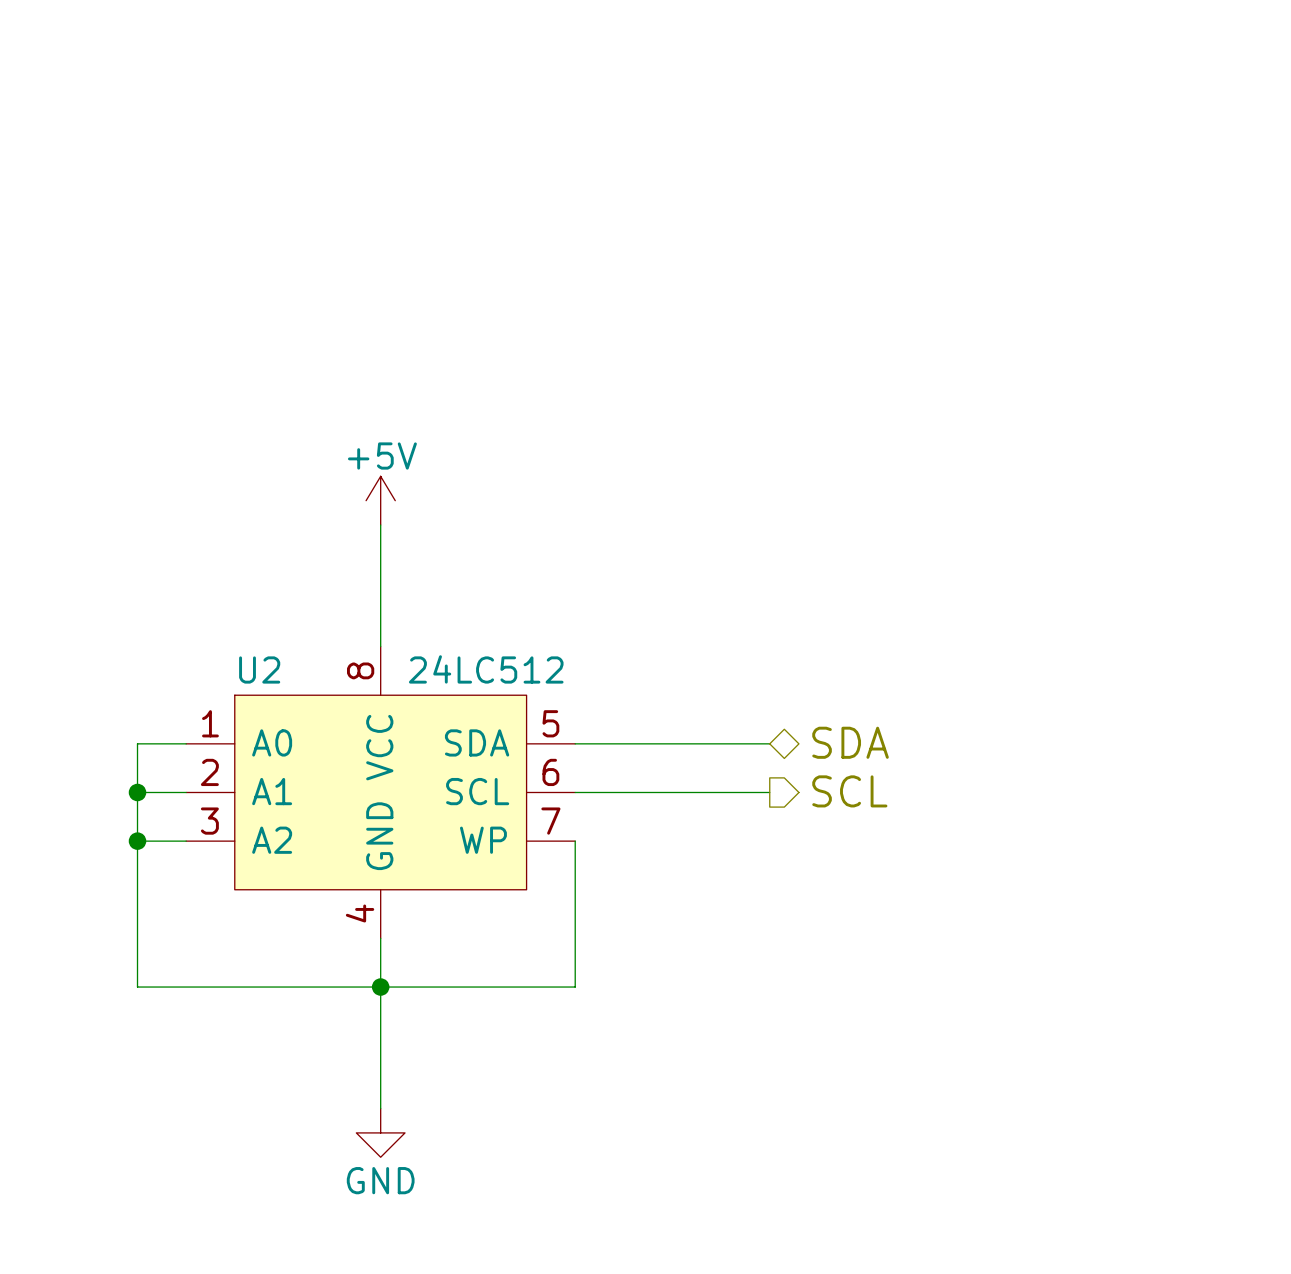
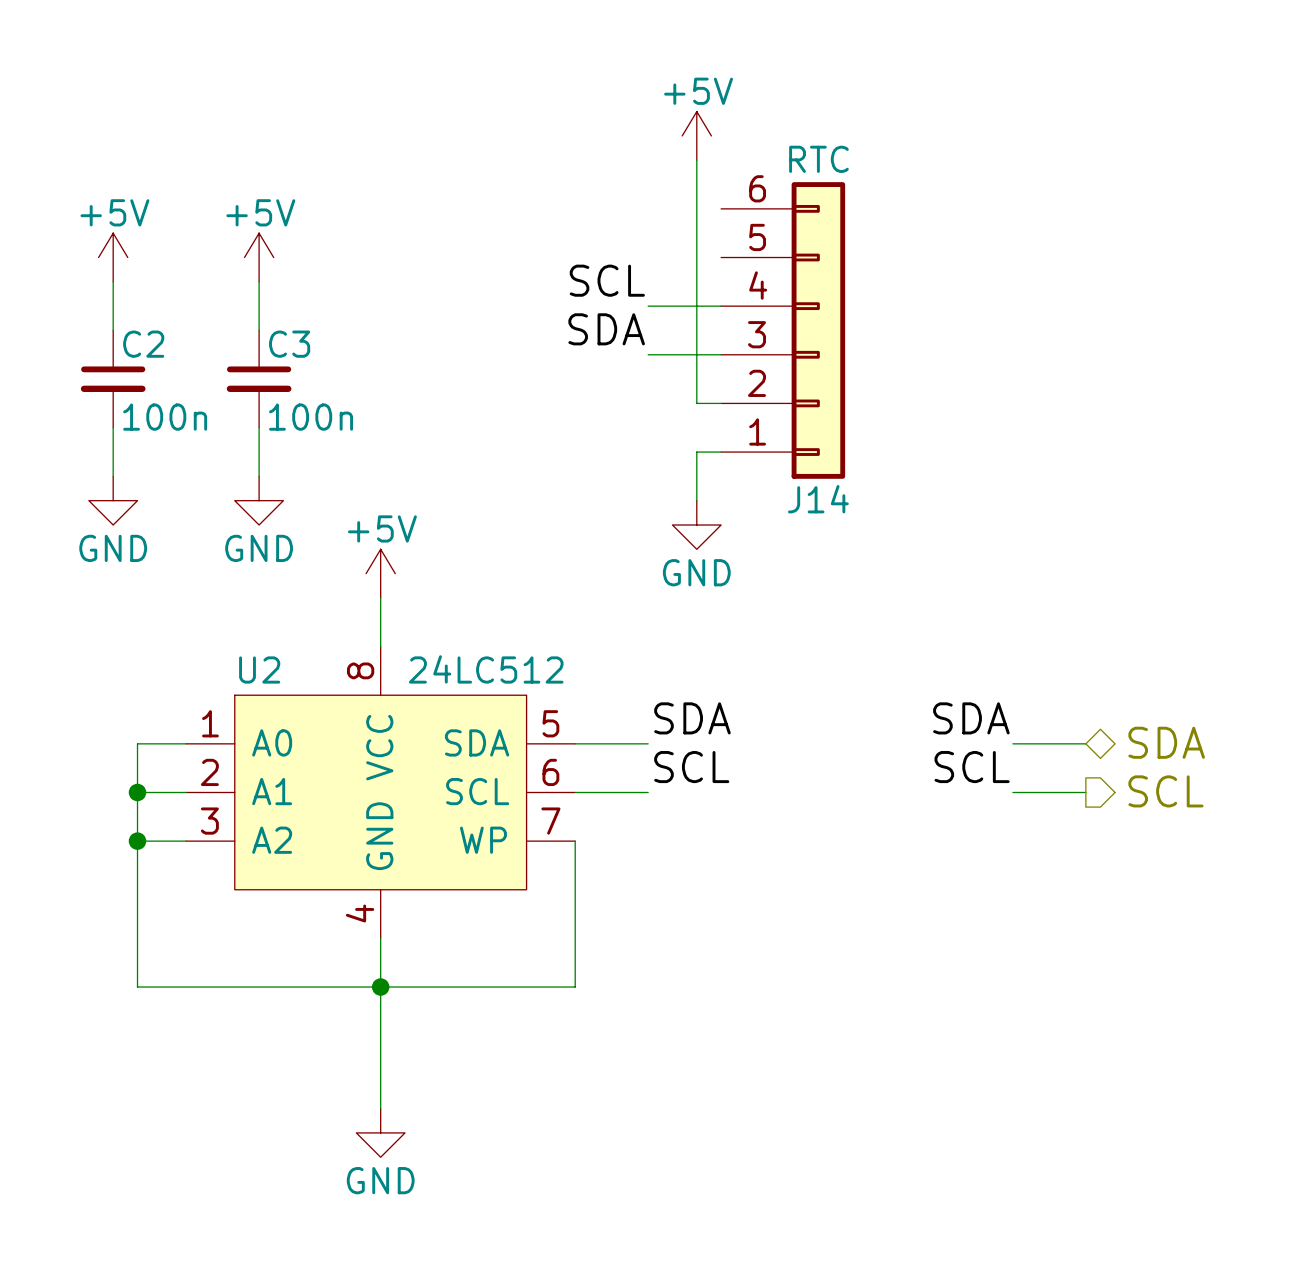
power symbol: none -> +5V (696, 135)
wire: none -> (696, 160) (696, 403) (721, 403)
power symbol: none -> +5V (113, 257)
power symbol: none -> +5V (259, 257)
label: none -> SCL (607, 280)
wire: none -> (113, 281) (113, 330)
wire: none -> (259, 281) (259, 330)
wire: none -> (648, 306) (721, 306)
label: none -> SDA (606, 329)
J14: none -> RTC (783, 330)
wire: none -> (648, 354) (721, 354)
C2: none -> 100n (113, 379)
C3: none -> 100n (259, 379)
wire: none -> (113, 427) (113, 476)
wire: none -> (259, 427) (259, 476)
wire: none -> (721, 452) (696, 452) (696, 500)
power symbol: none -> GND (113, 500)
power symbol: none -> GND (259, 500)
power symbol position: +5V (380, 500) -> +5V (380, 573)
power symbol: none -> GND (696, 525)
label: none -> SDA (692, 718)
label: none -> SDA (971, 718)
hierarchical label position: SDA (850, 742) -> SDA (1166, 742)
wire: (648, 743) (769, 743) -> none
wire: none -> (1012, 743) (1085, 743)
label: none -> SCL (691, 767)
label: none -> SCL (972, 767)
hierarchical label position: SCL (849, 791) -> SCL (1165, 791)
wire: (648, 792) (769, 792) -> none
wire: none -> (1012, 792) (1085, 792)

